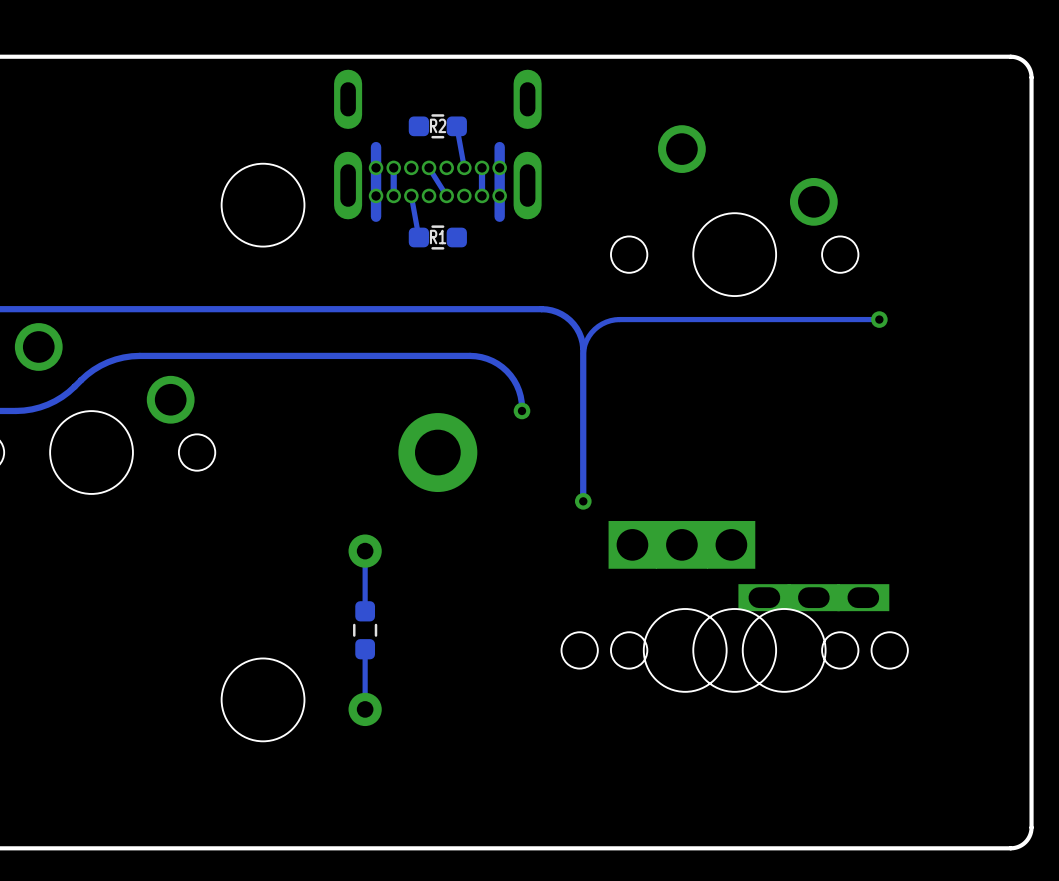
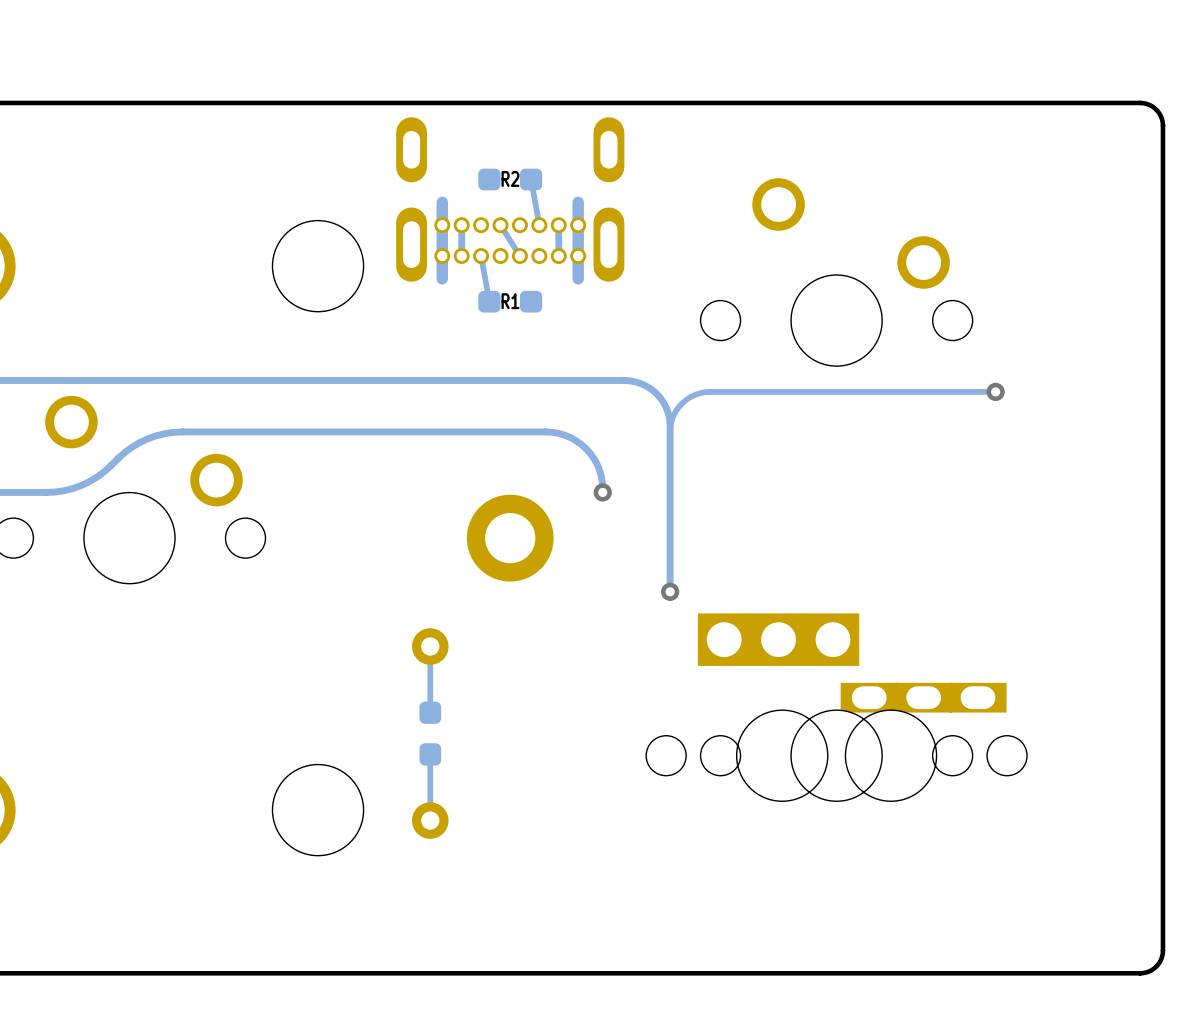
R2 footprint: [408, 114, 467, 139] -> [478, 168, 543, 191]
R1 footprint: [408, 225, 467, 250] -> [478, 290, 543, 313]
part footprint: [348, 534, 382, 727] -> [412, 628, 449, 839]

